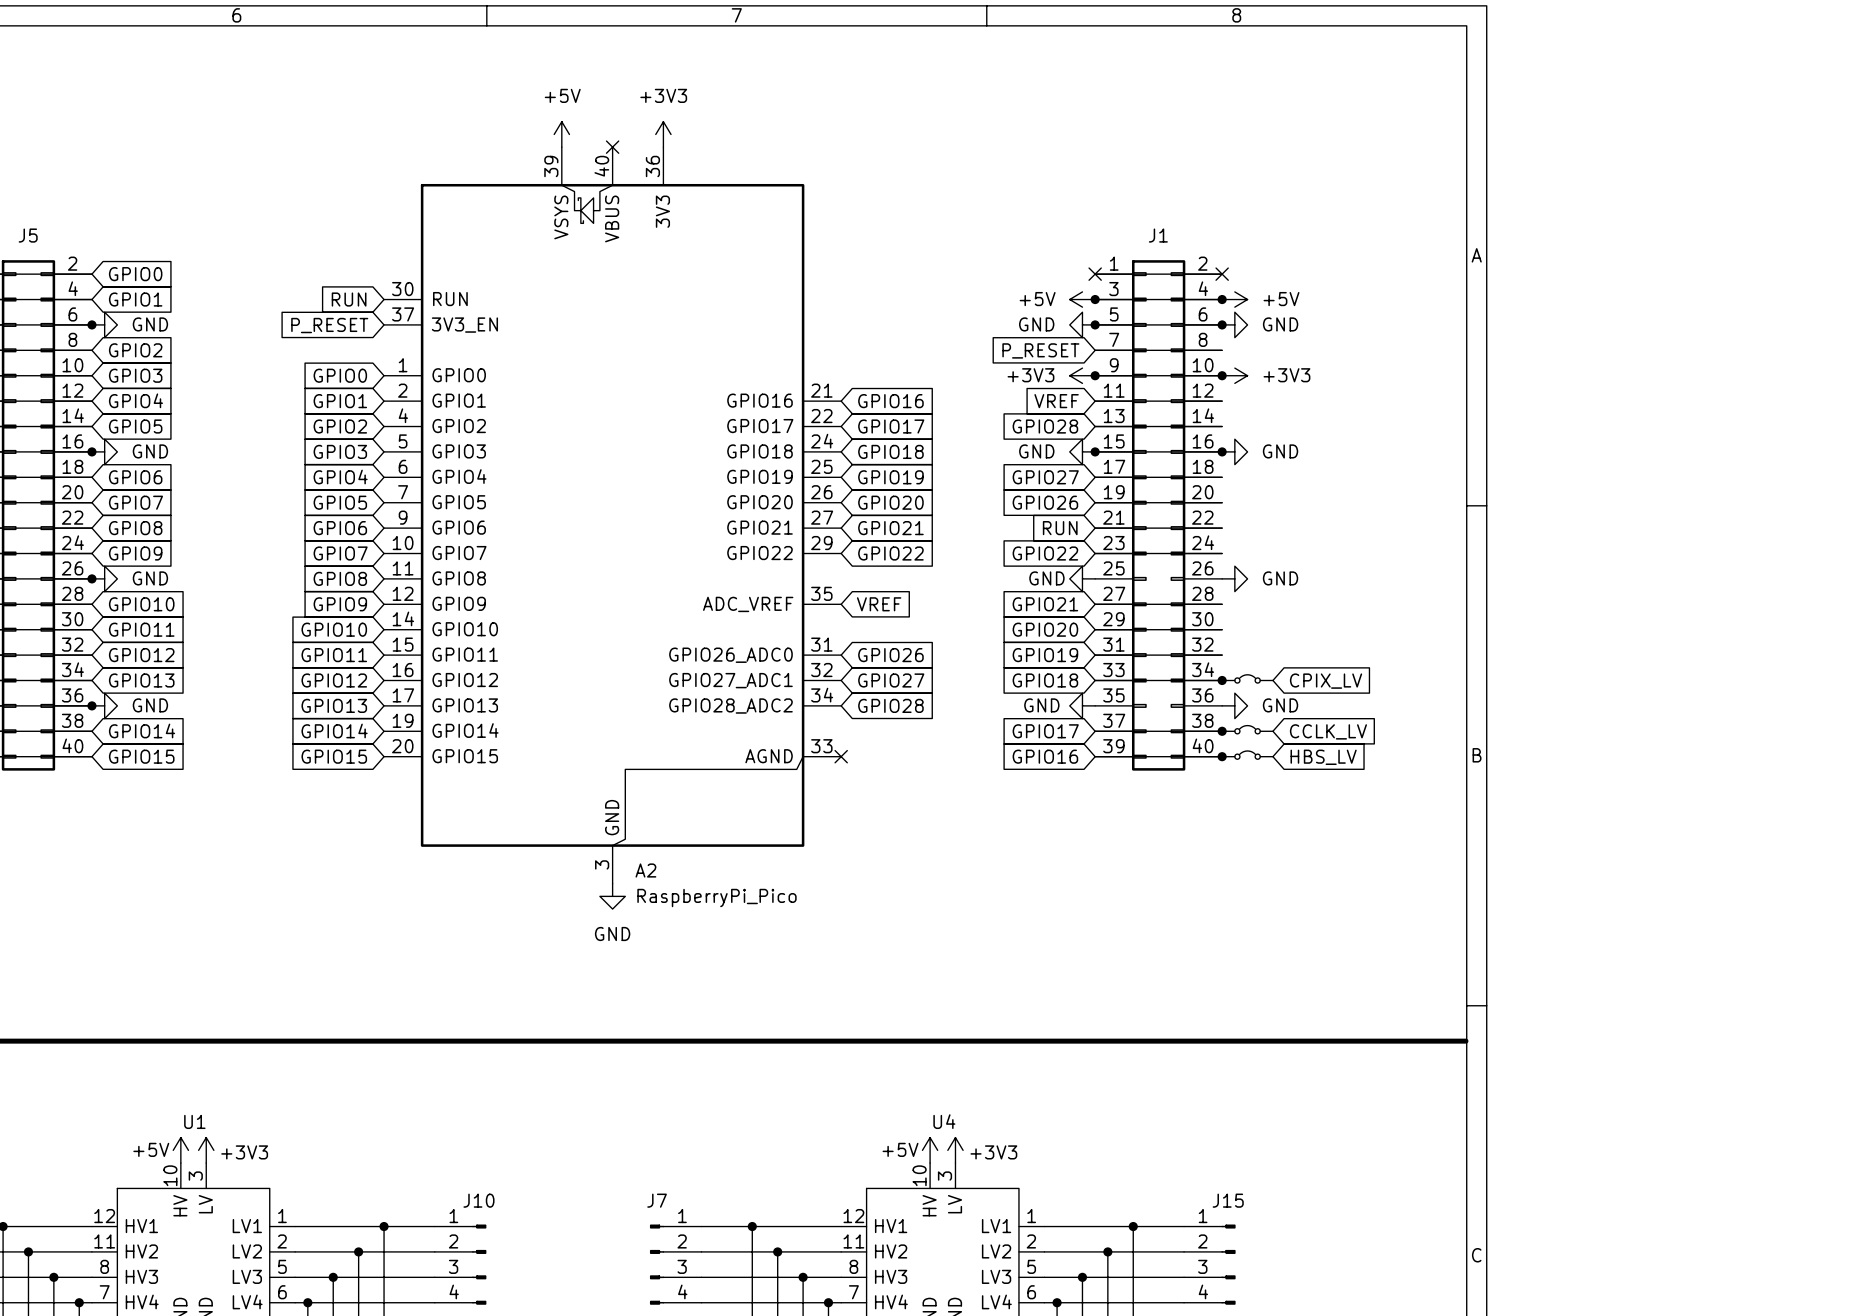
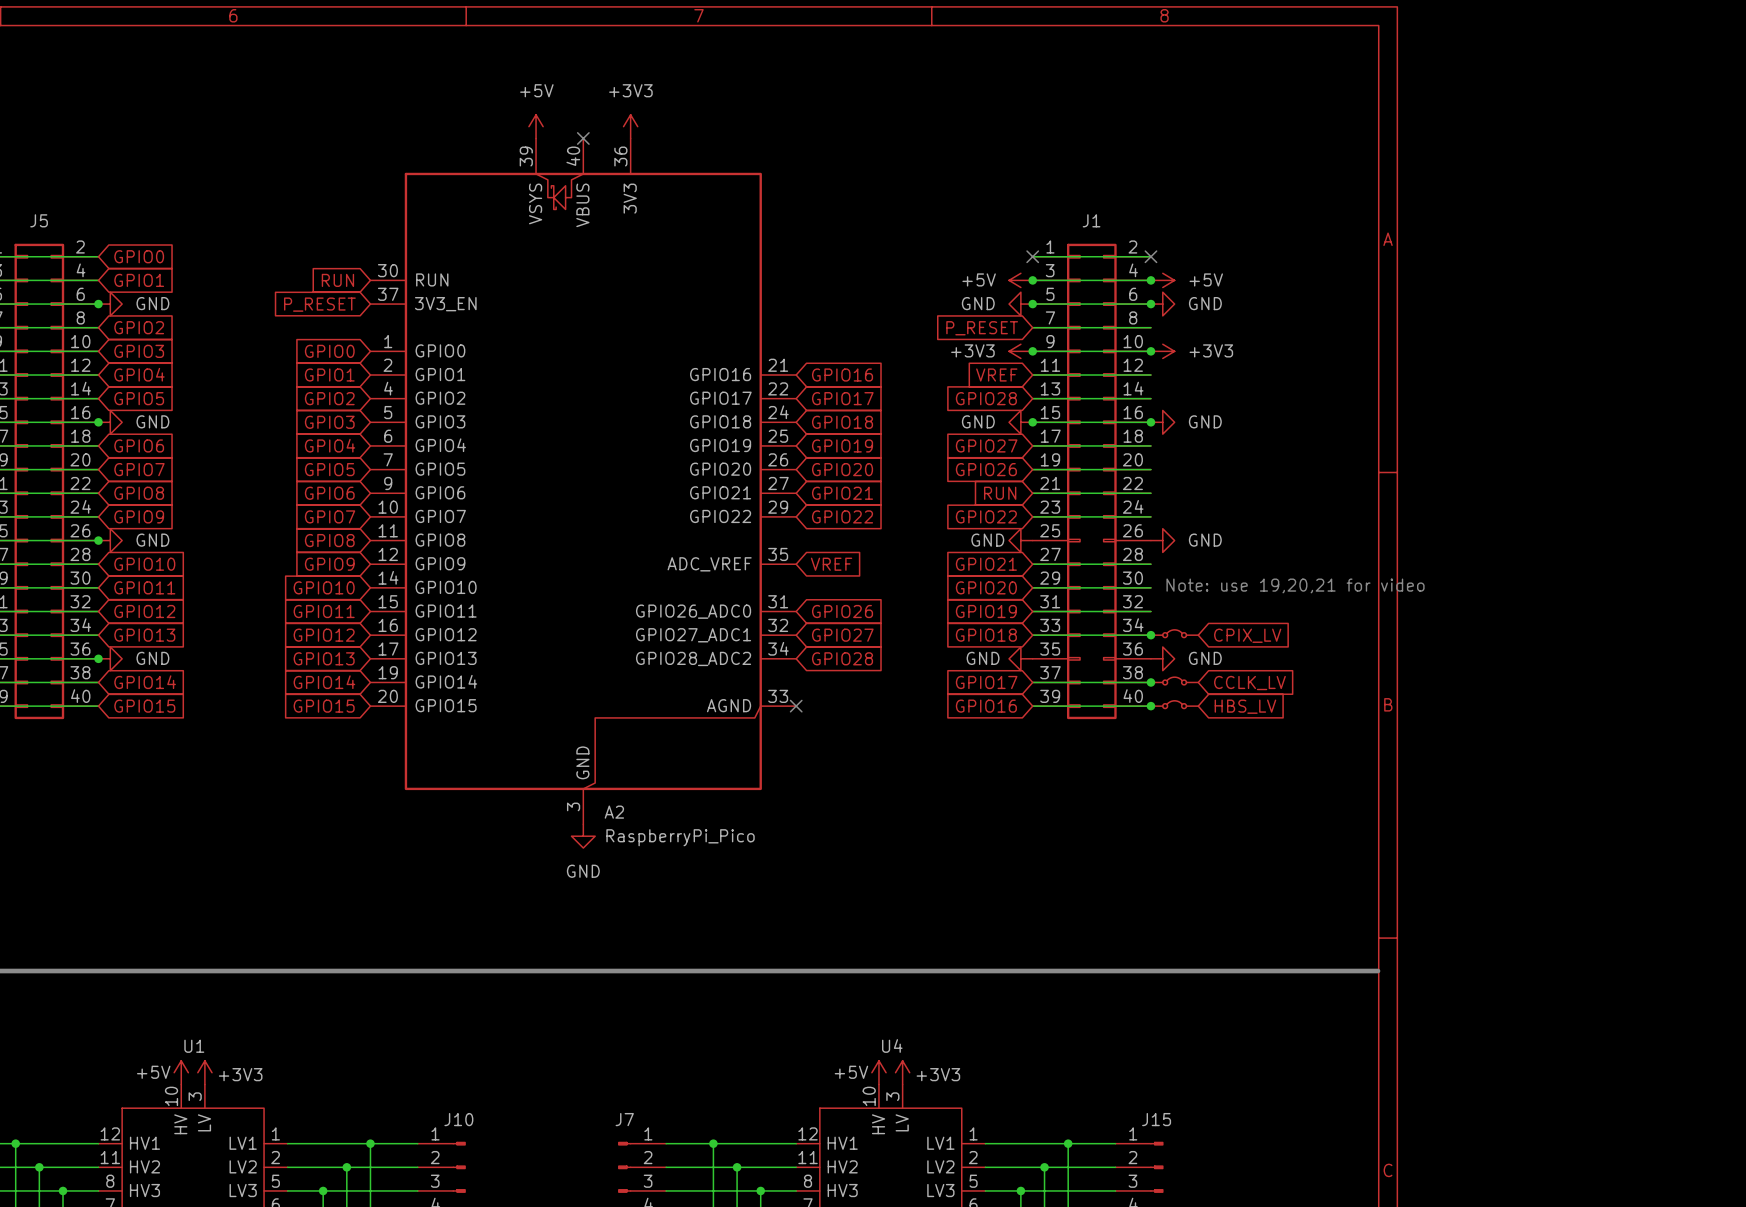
text: none -> Note: use 19,20,21 for video (1295, 585)

